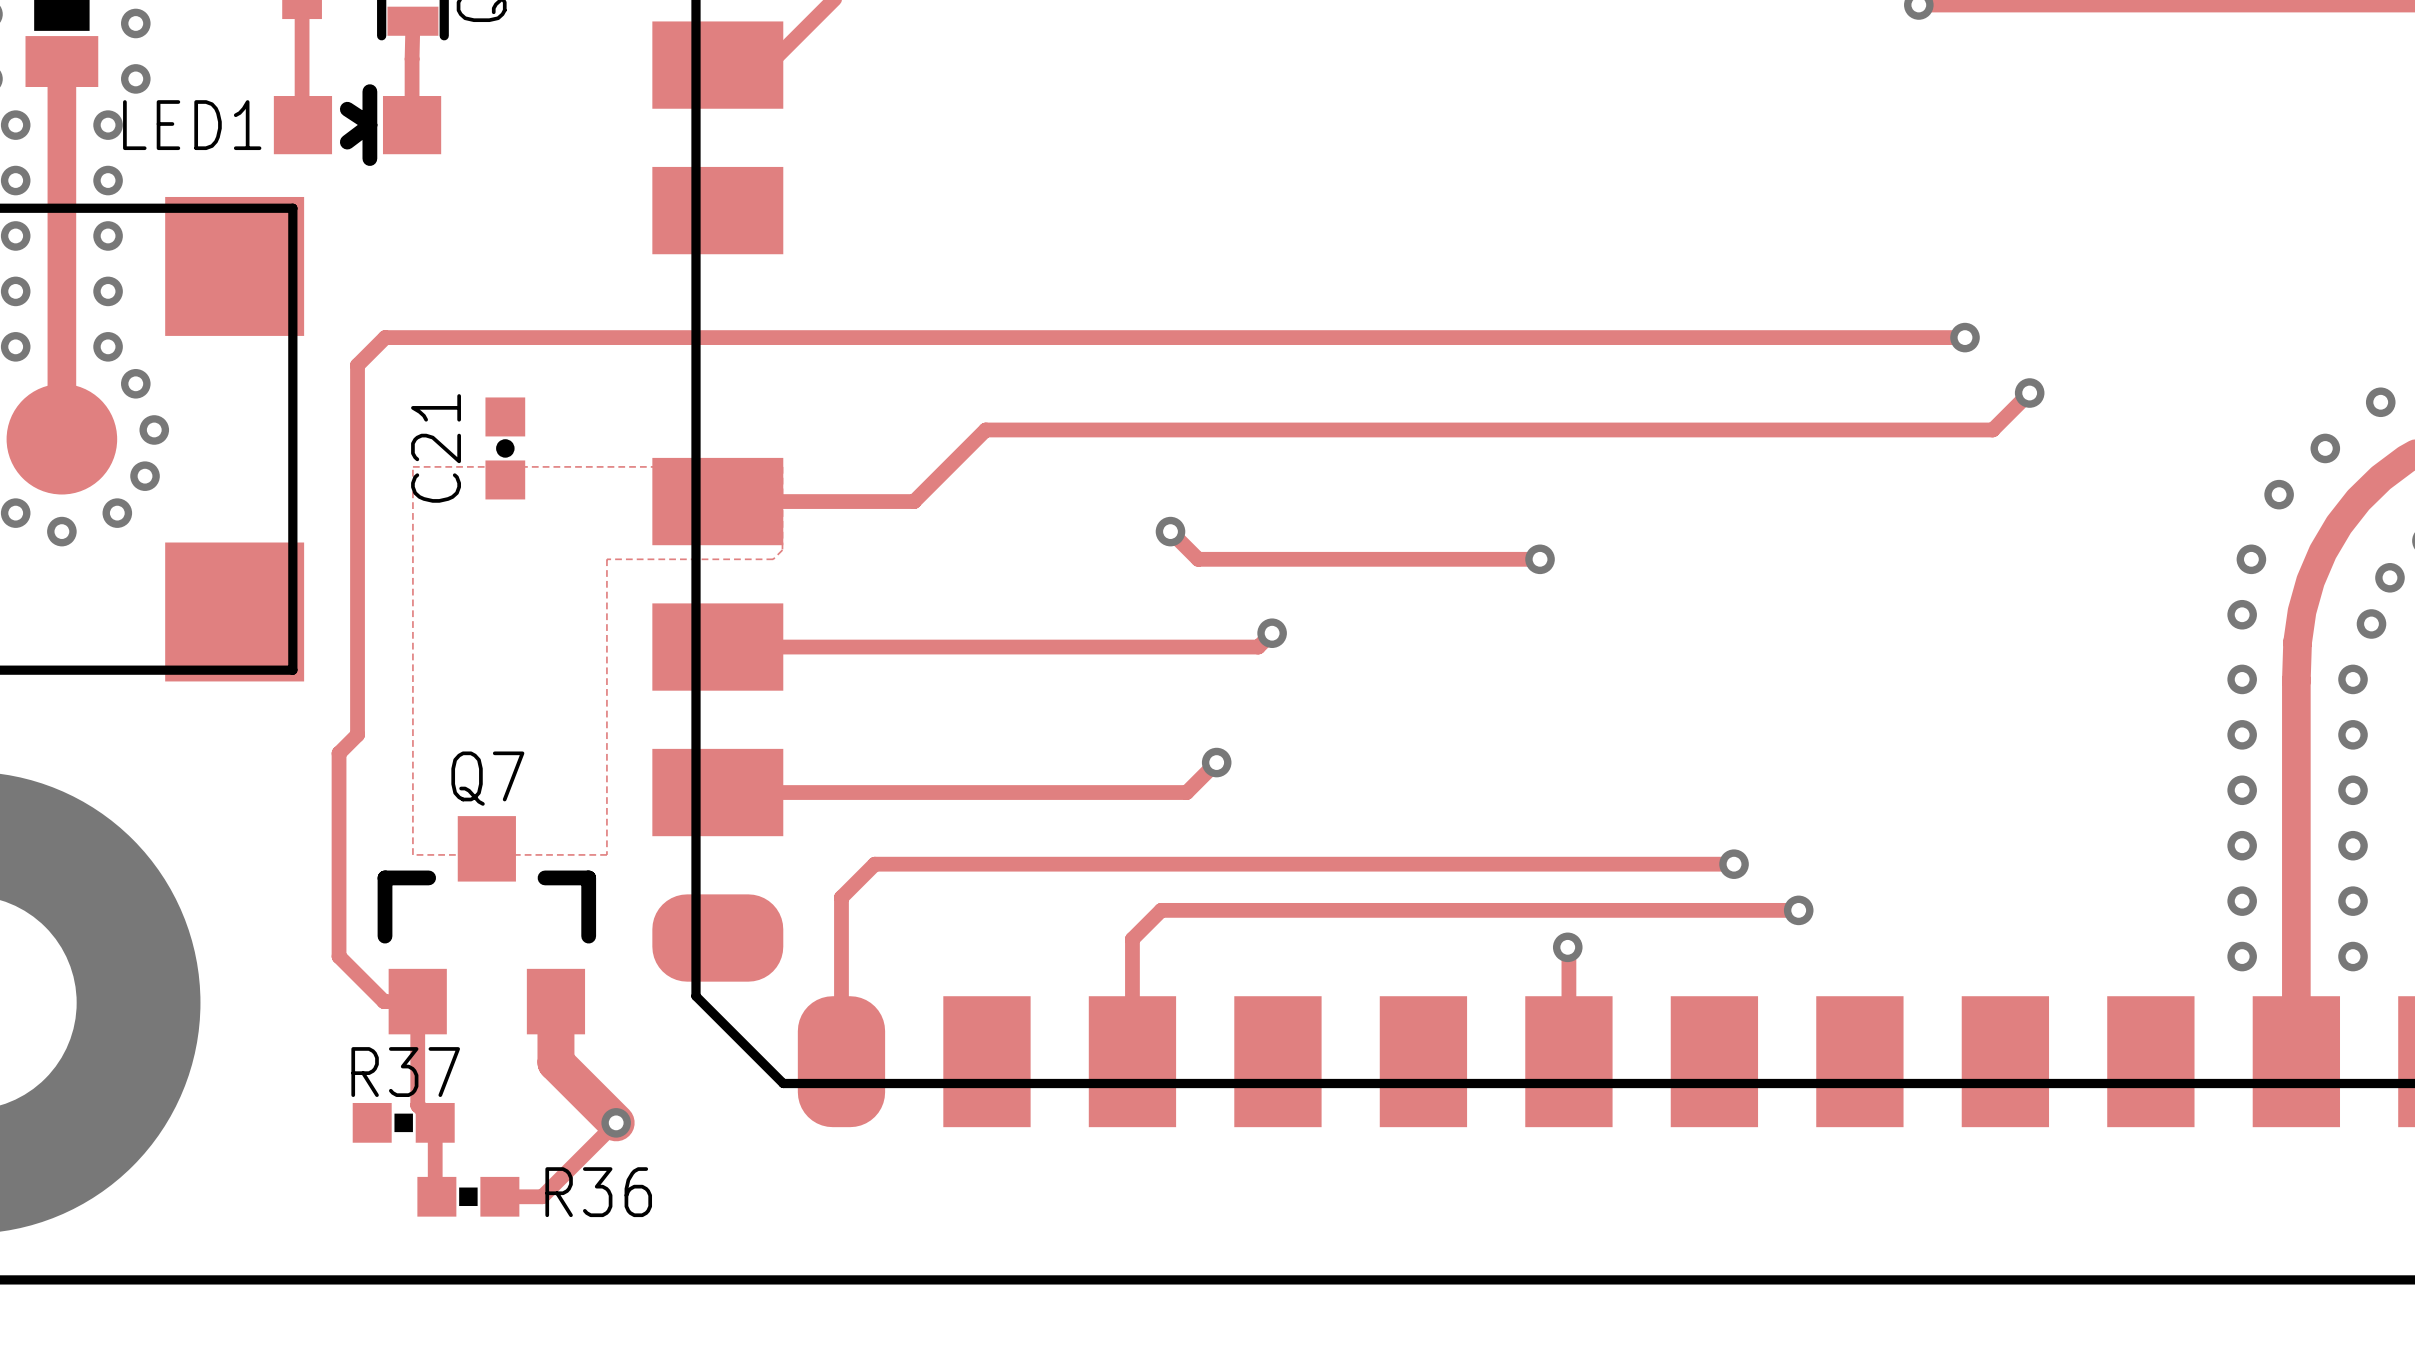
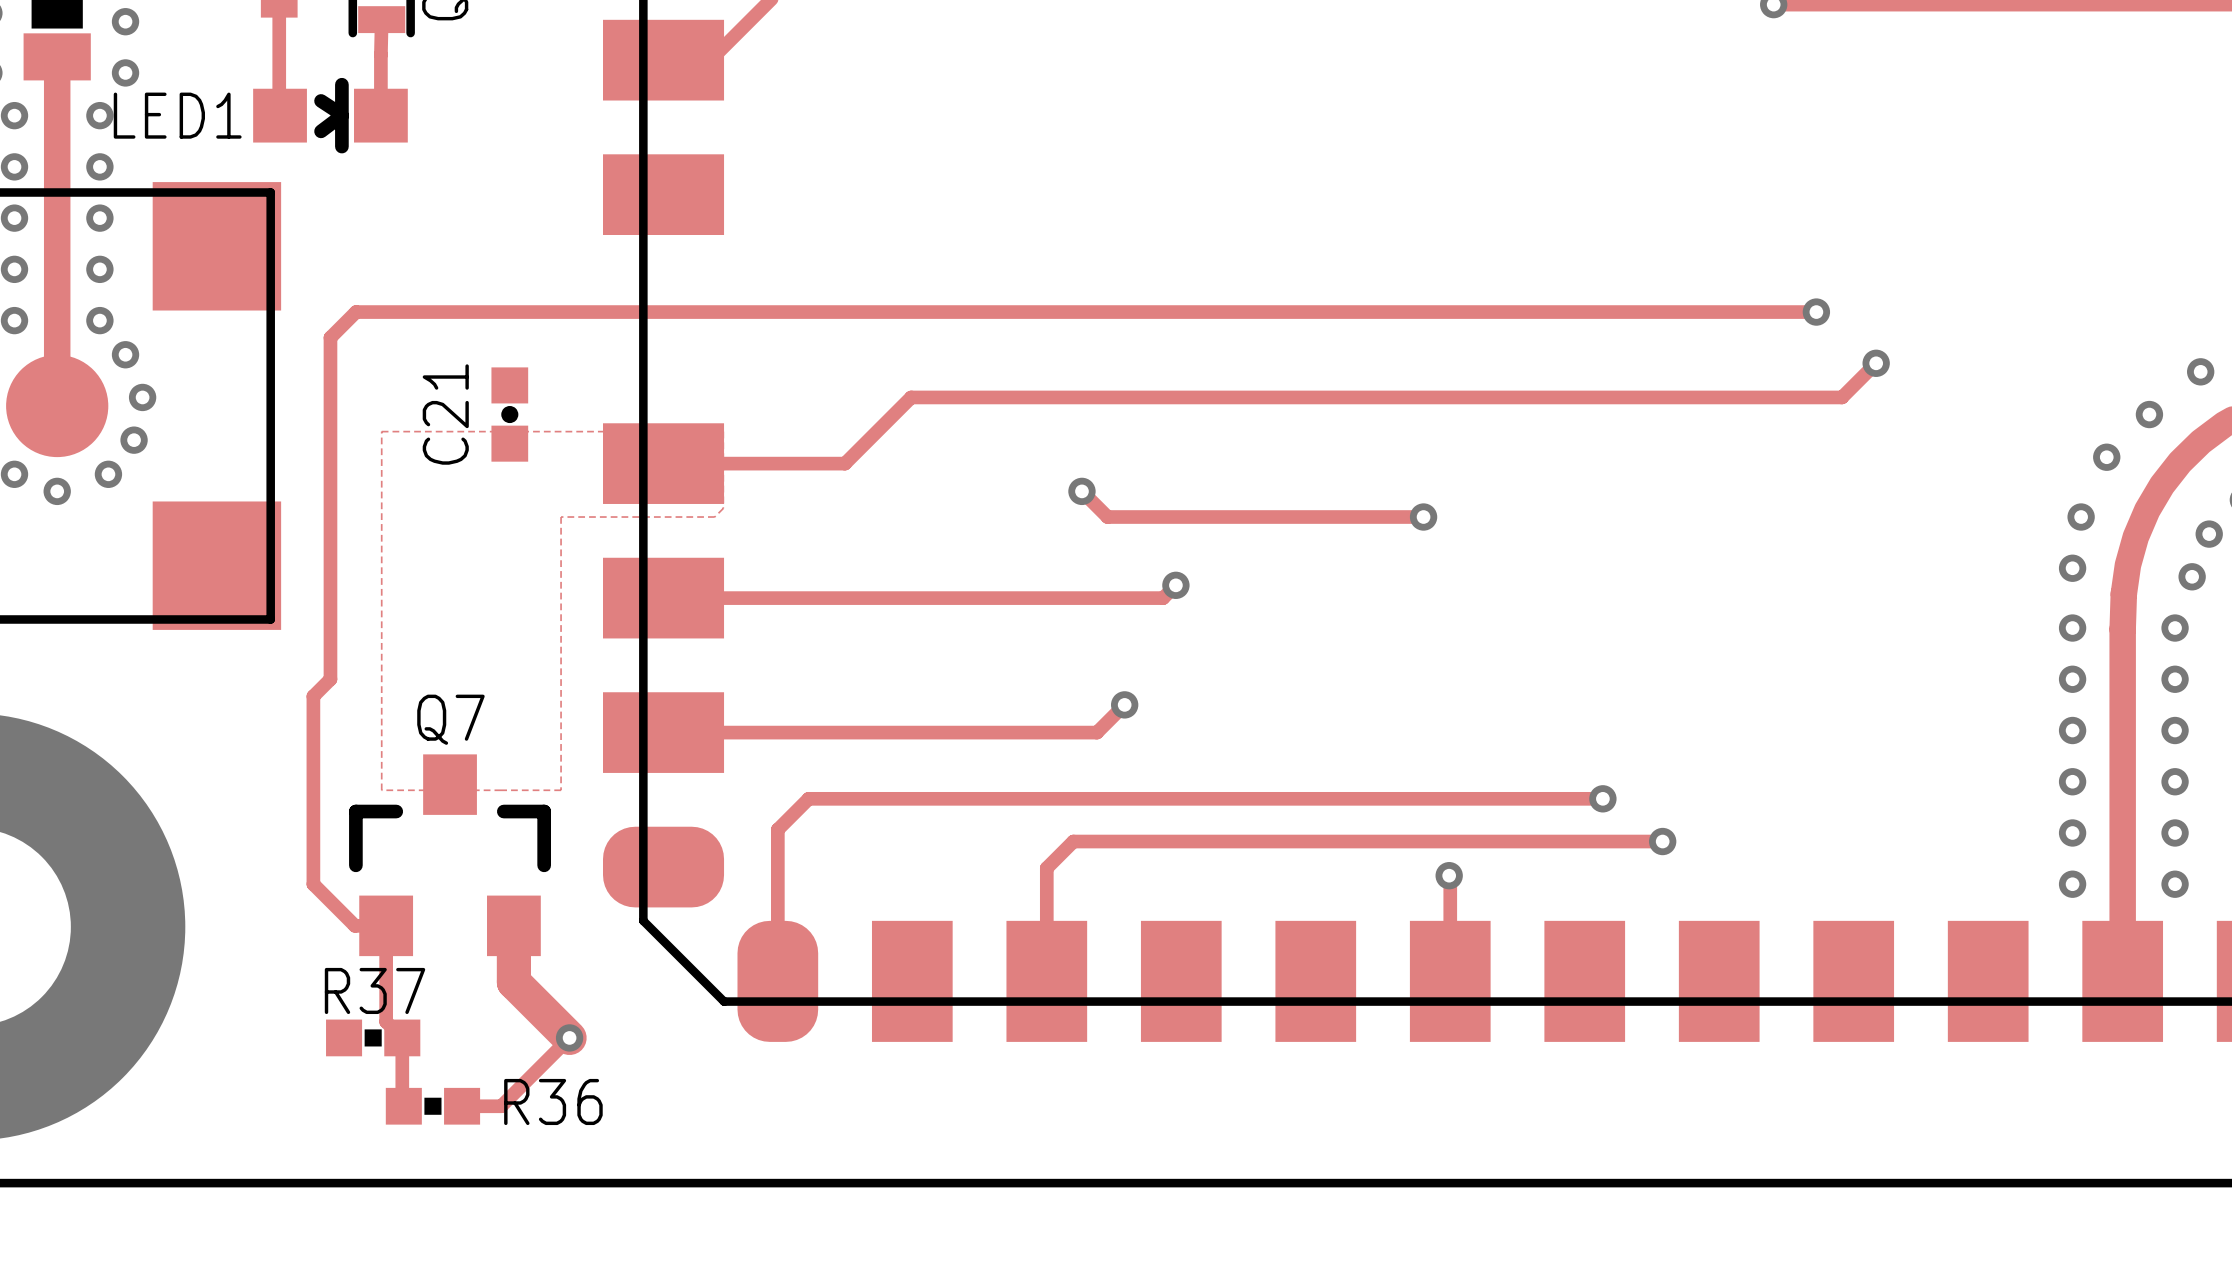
C21 position: (505, 448) -> (509, 414)

